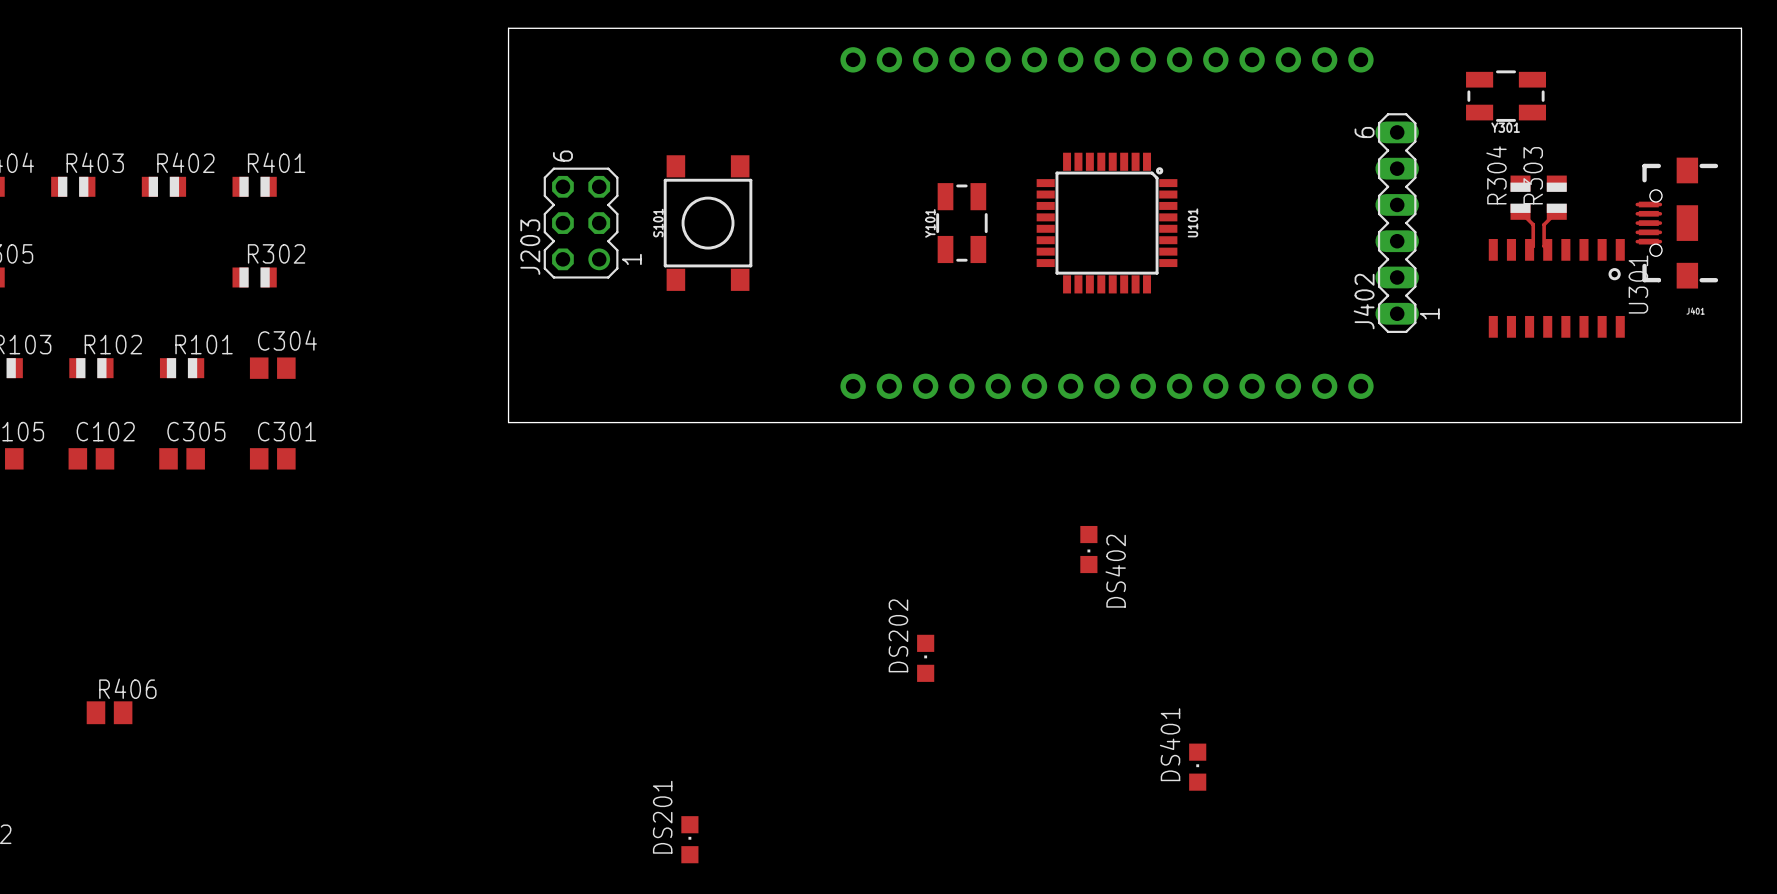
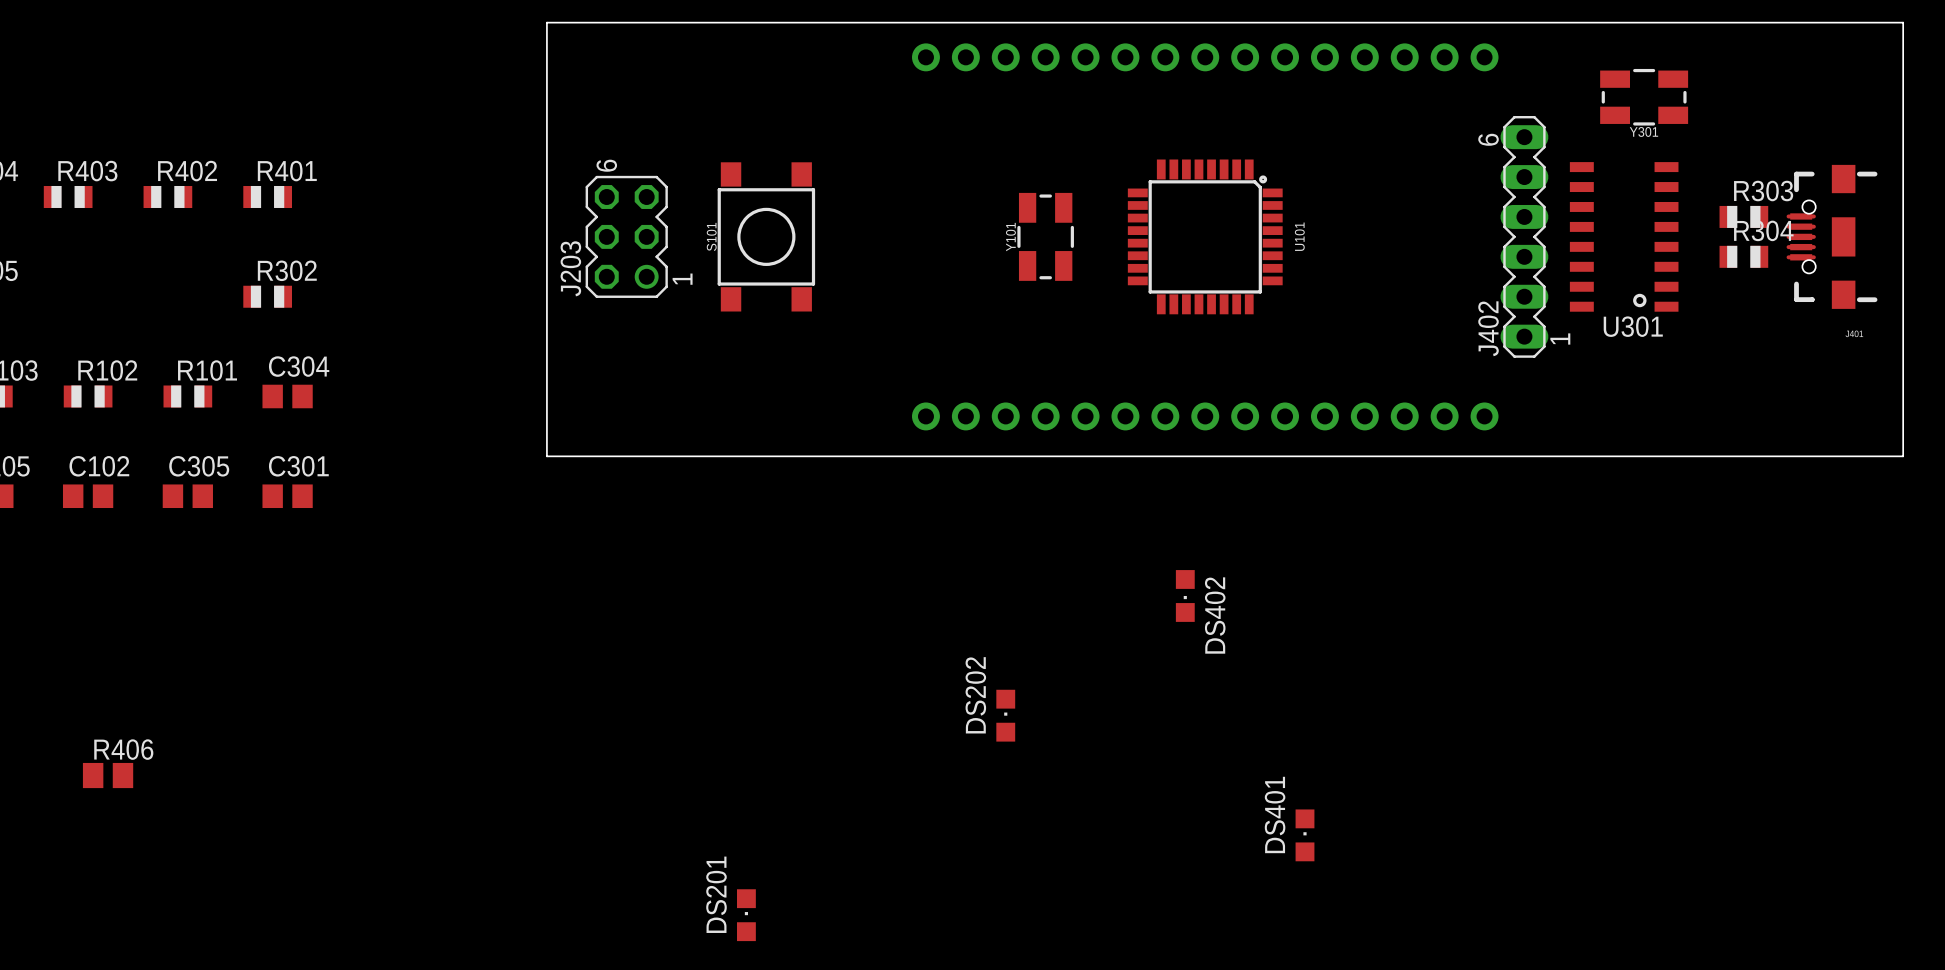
R304 rotation: 0° (1520, 197) -> 90° clockwise (1743, 256)
R304 position: (1520, 197) -> (1743, 256)
R303 rotation: 0° (1556, 197) -> 90° clockwise (1743, 216)
R303 position: (1556, 197) -> (1743, 216)
top track: (1520, 211) (1533, 224) (1533, 246) (1529, 249) -> none
top track: (1556, 211) (1544, 224) (1544, 246) (1547, 249) -> none
U301 rotation: 0° (1556, 288) -> 90° clockwise (1624, 236)
U301 position: (1556, 288) -> (1624, 236)

